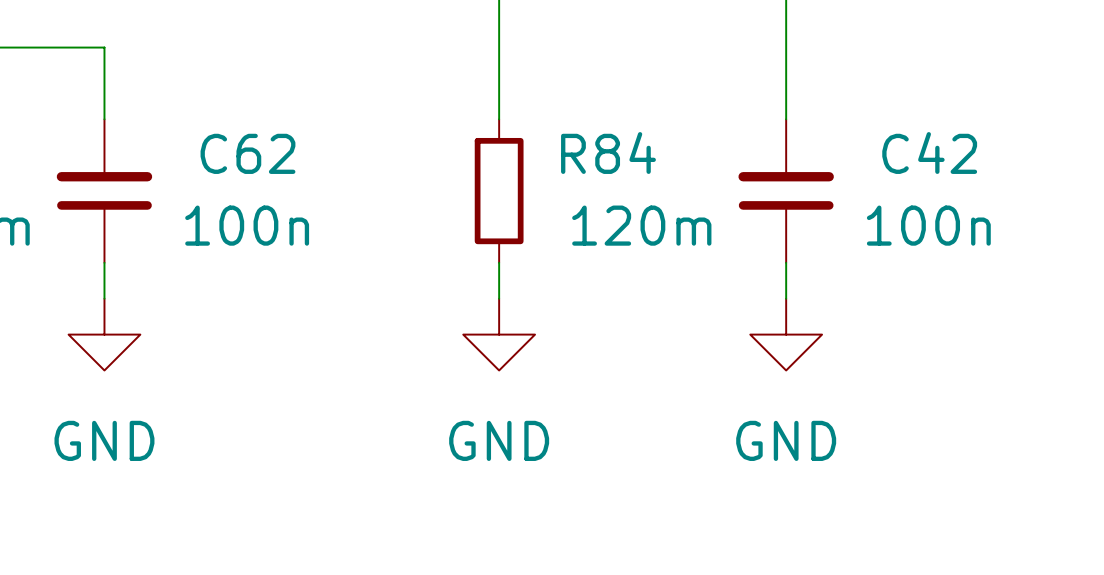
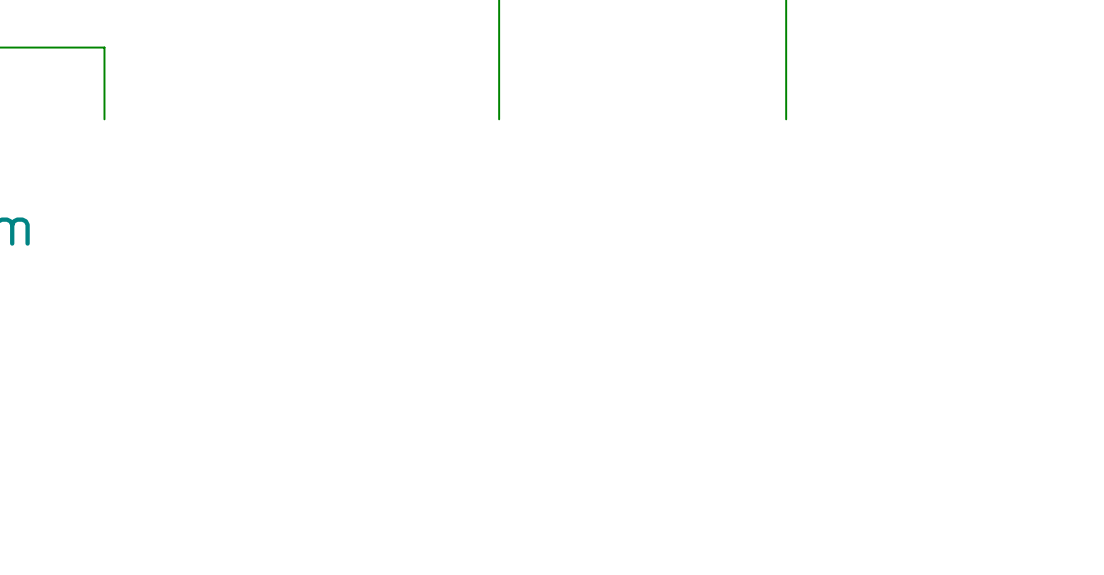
C62: 100n (104, 191) -> none
R84: 120m (499, 191) -> none
C42: 100n (786, 191) -> none
wire: (104, 262) (104, 298) -> none
wire: (499, 262) (499, 298) -> none
wire: (786, 262) (786, 298) -> none
power symbol: GND (104, 334) -> none
power symbol: GND (499, 334) -> none
power symbol: GND (786, 334) -> none

